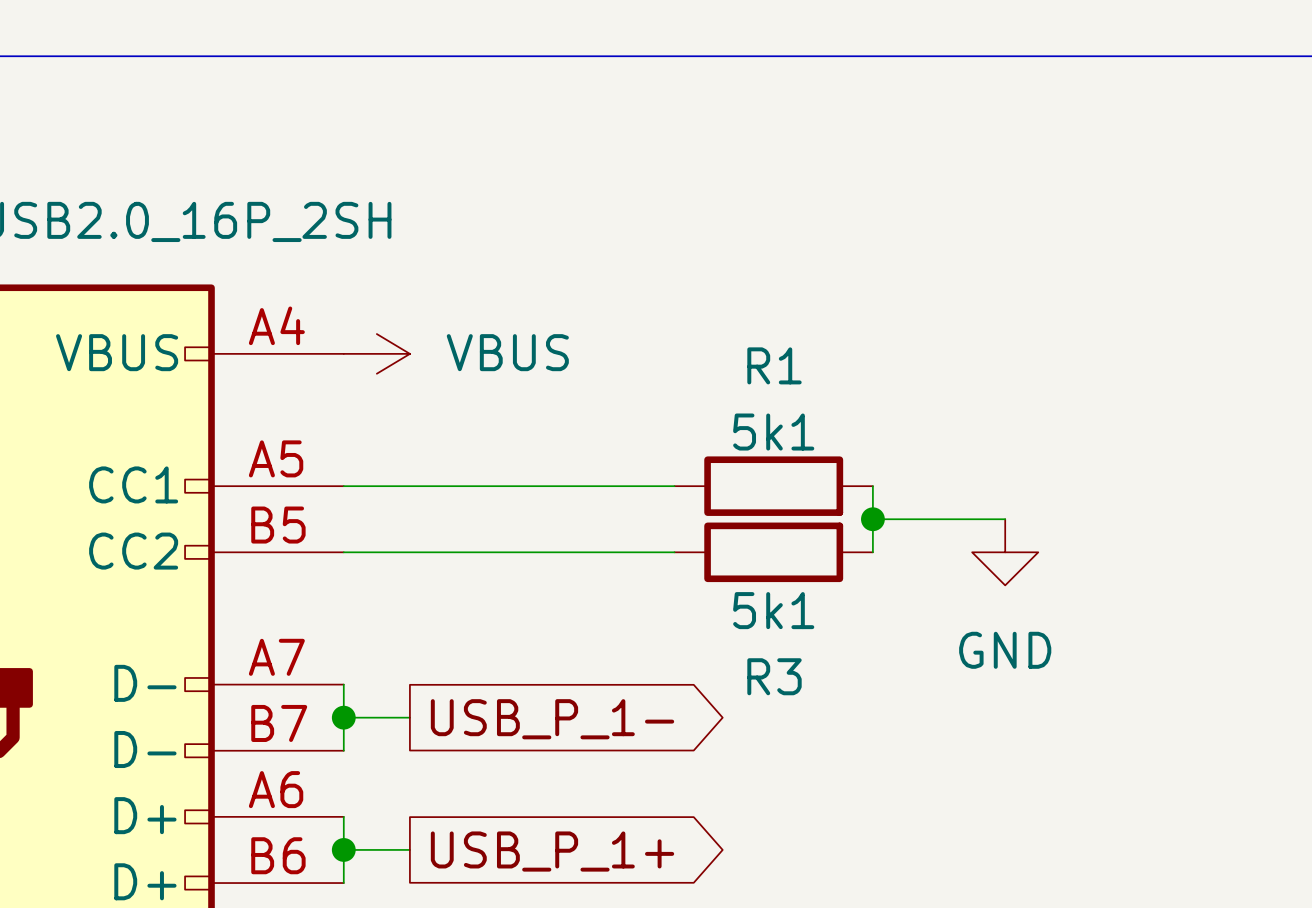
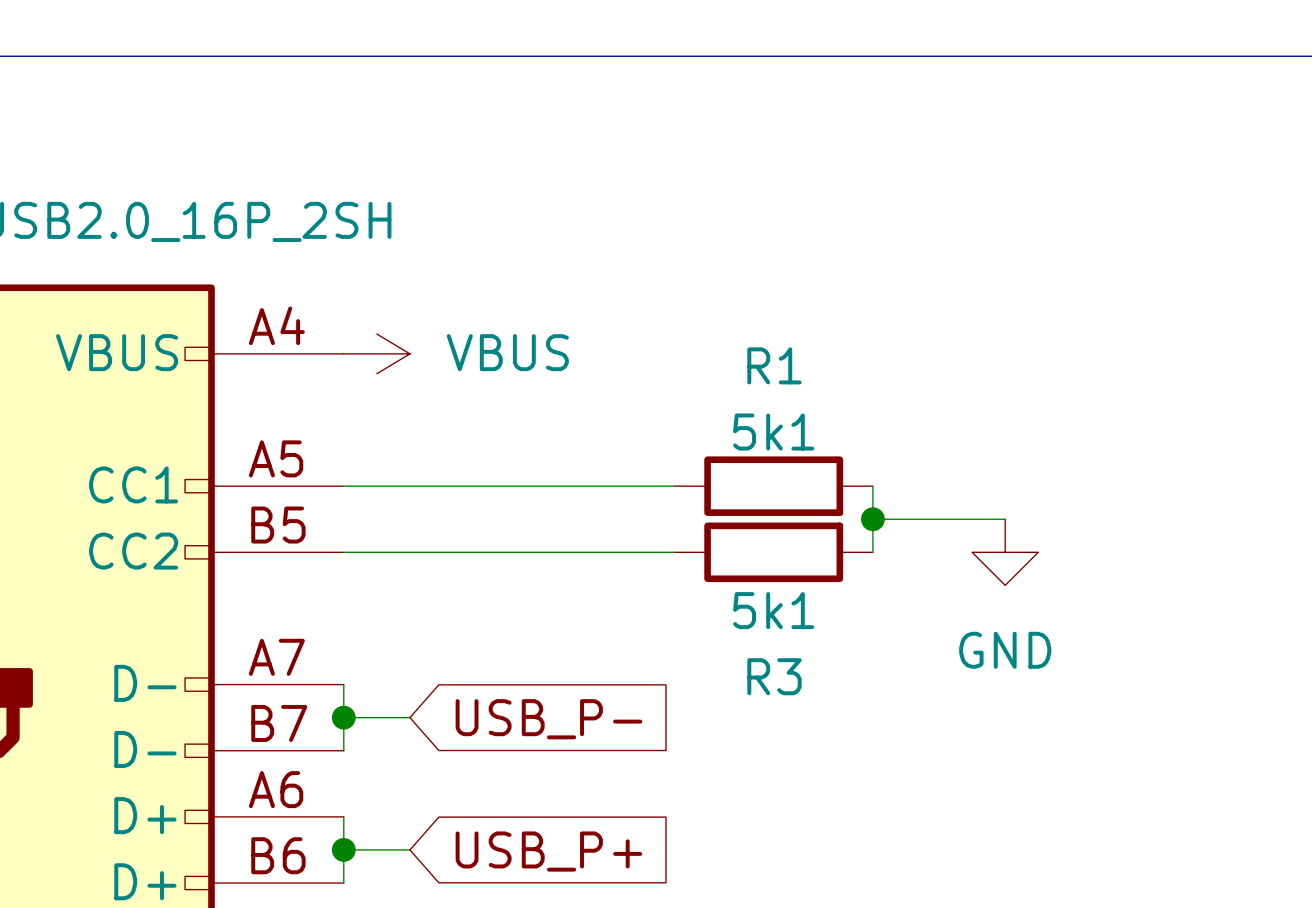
global label shape: output (552, 719) -> input (548, 719)
global label: USB_P_1- (552, 719) -> USB_P- (548, 719)
global label shape: output (552, 851) -> input (548, 851)
global label: USB_P_1+ (552, 851) -> USB_P+ (548, 851)

